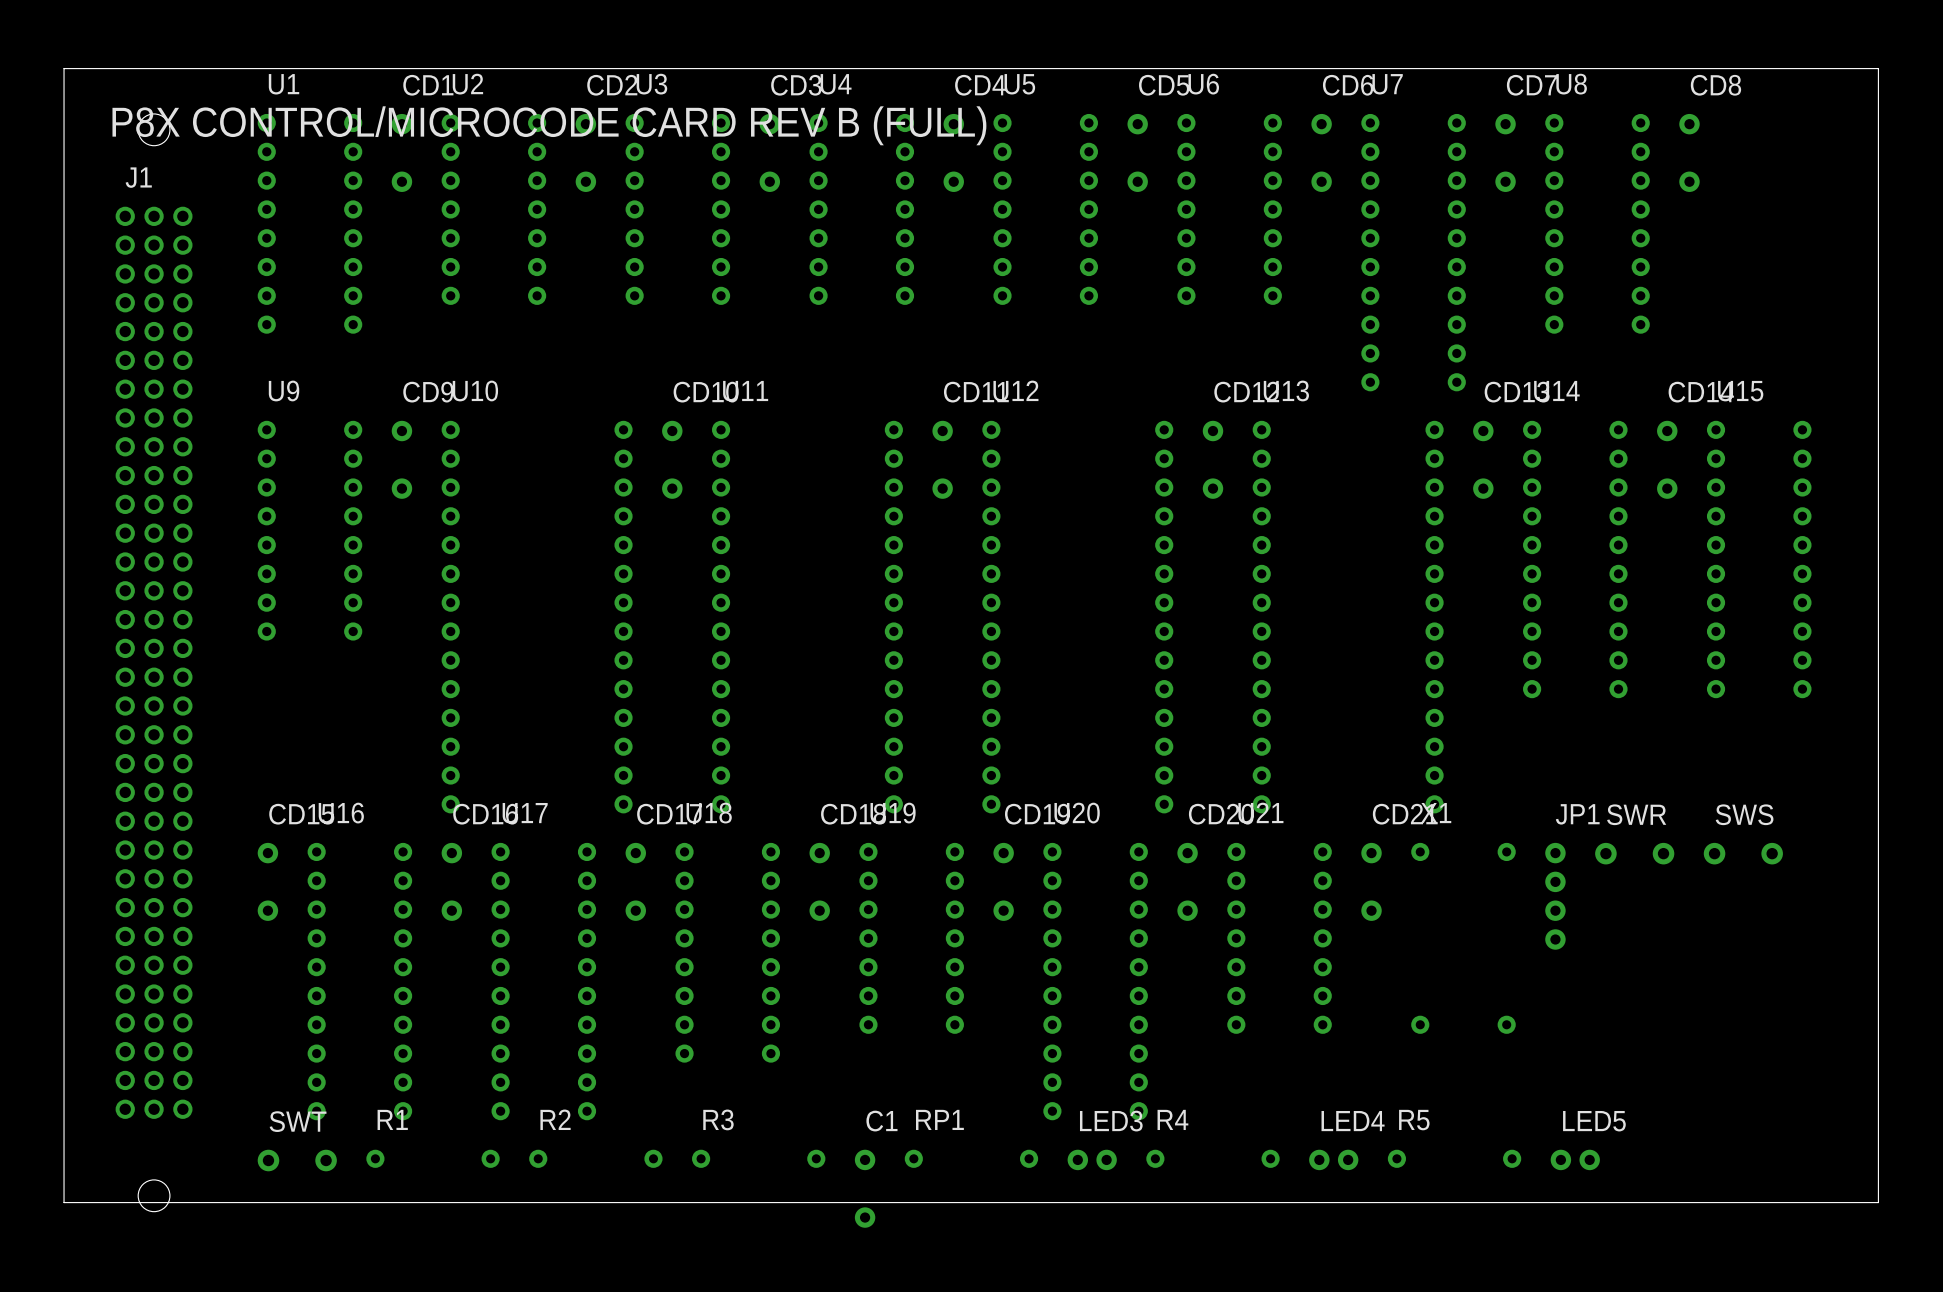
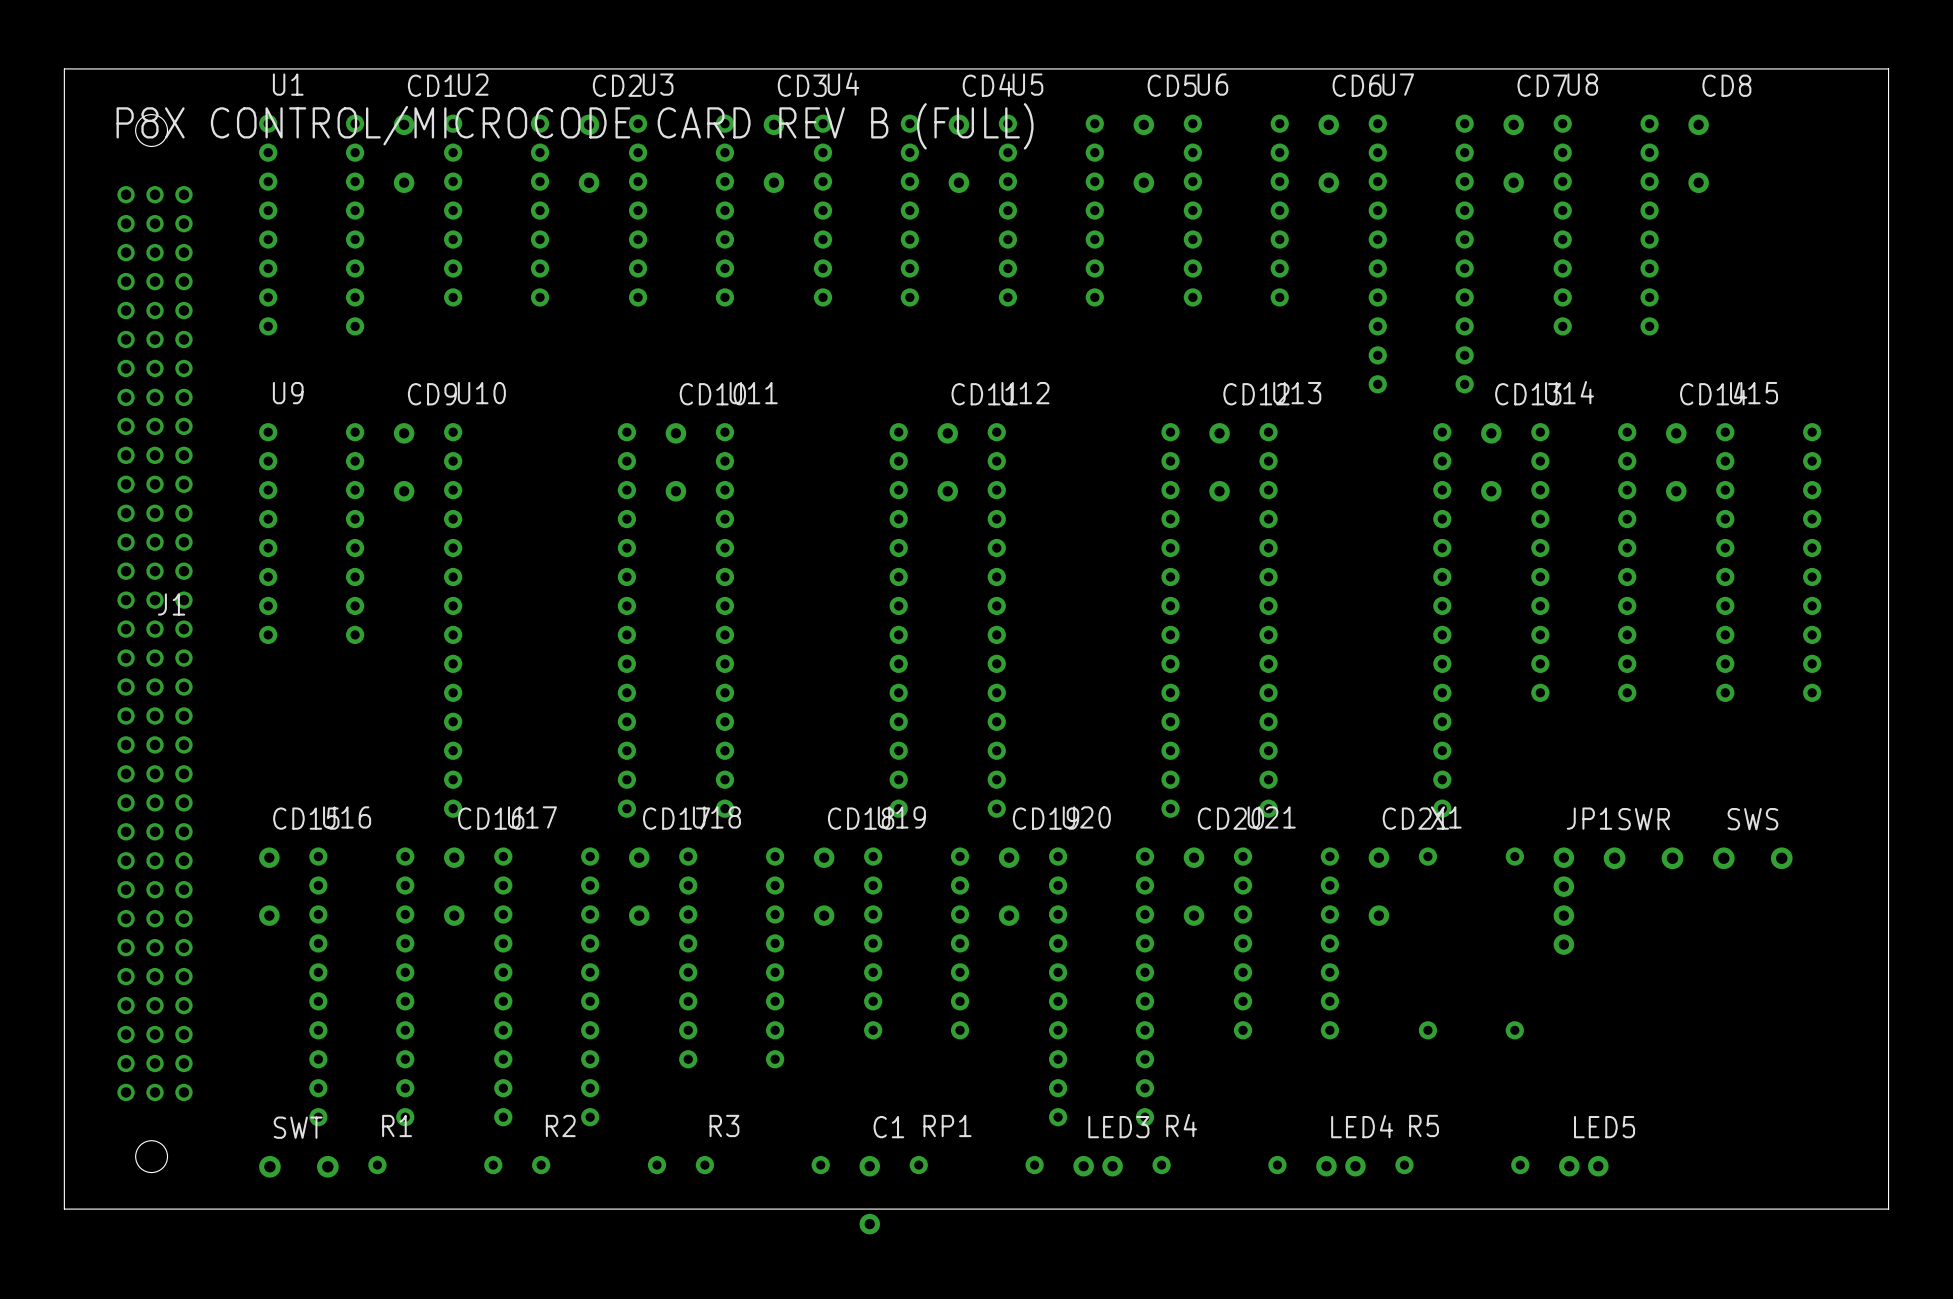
J1 footprint: [115, 113, 193, 1212] -> [117, 114, 193, 1173]
J1 name position: J1 (138, 177) -> J1 (171, 604)

